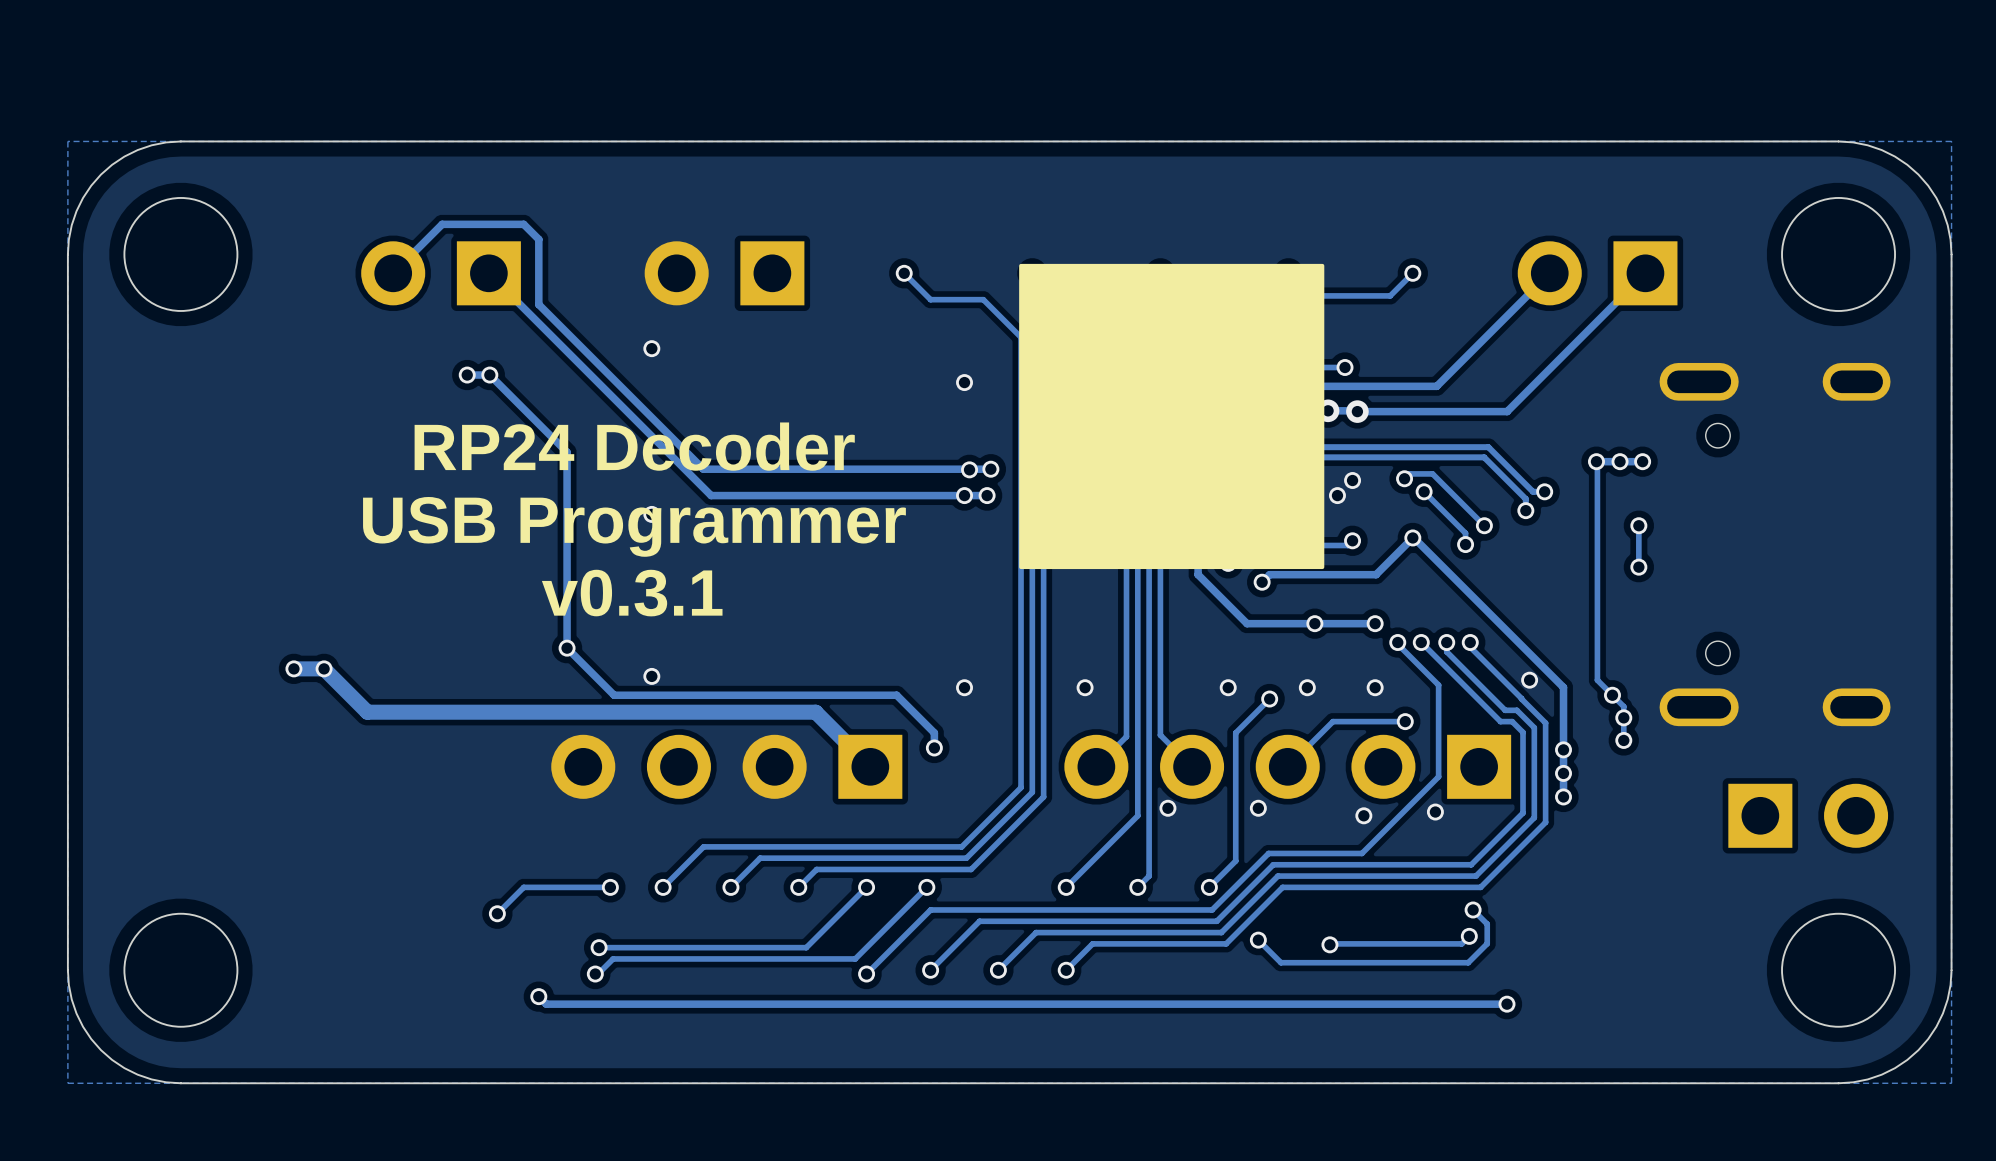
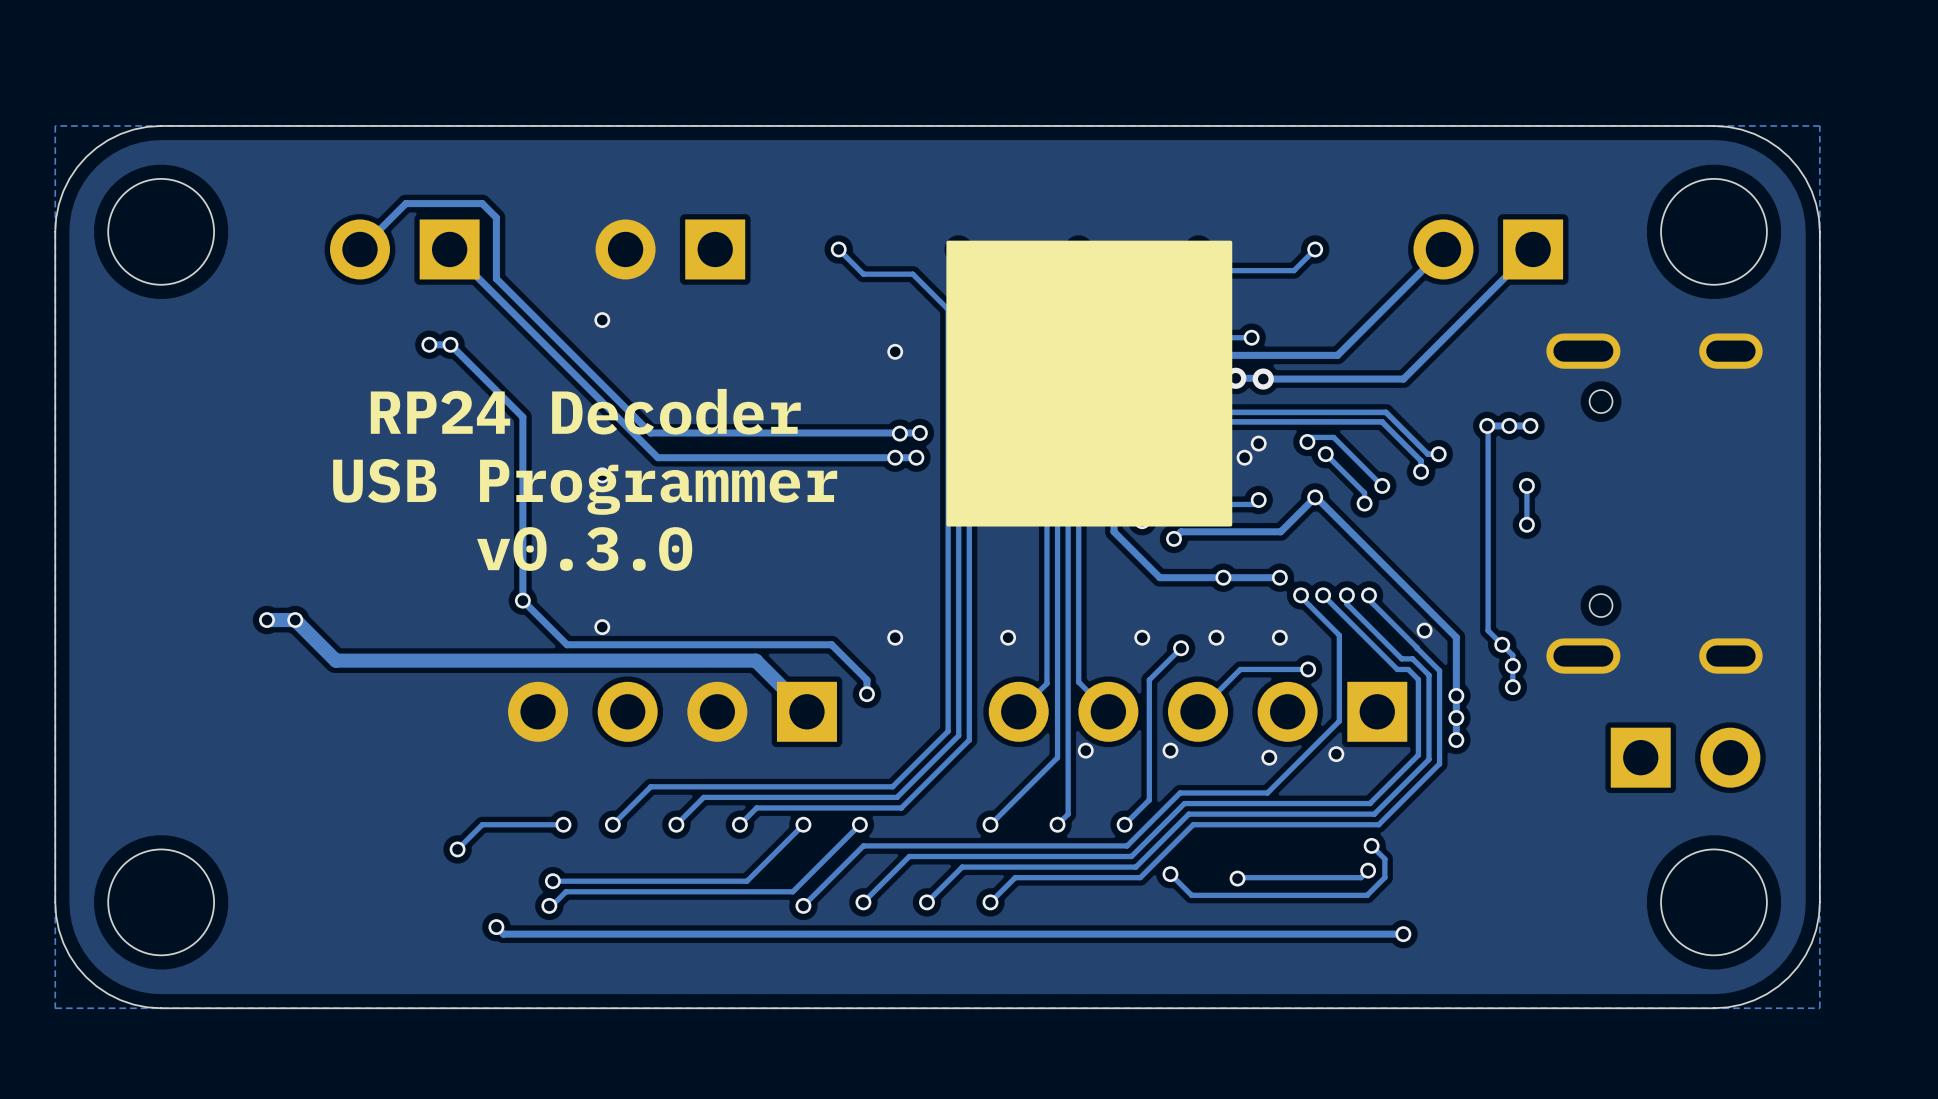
text: v0.3.1 (632, 593) -> v0.3.0 (584, 549)

